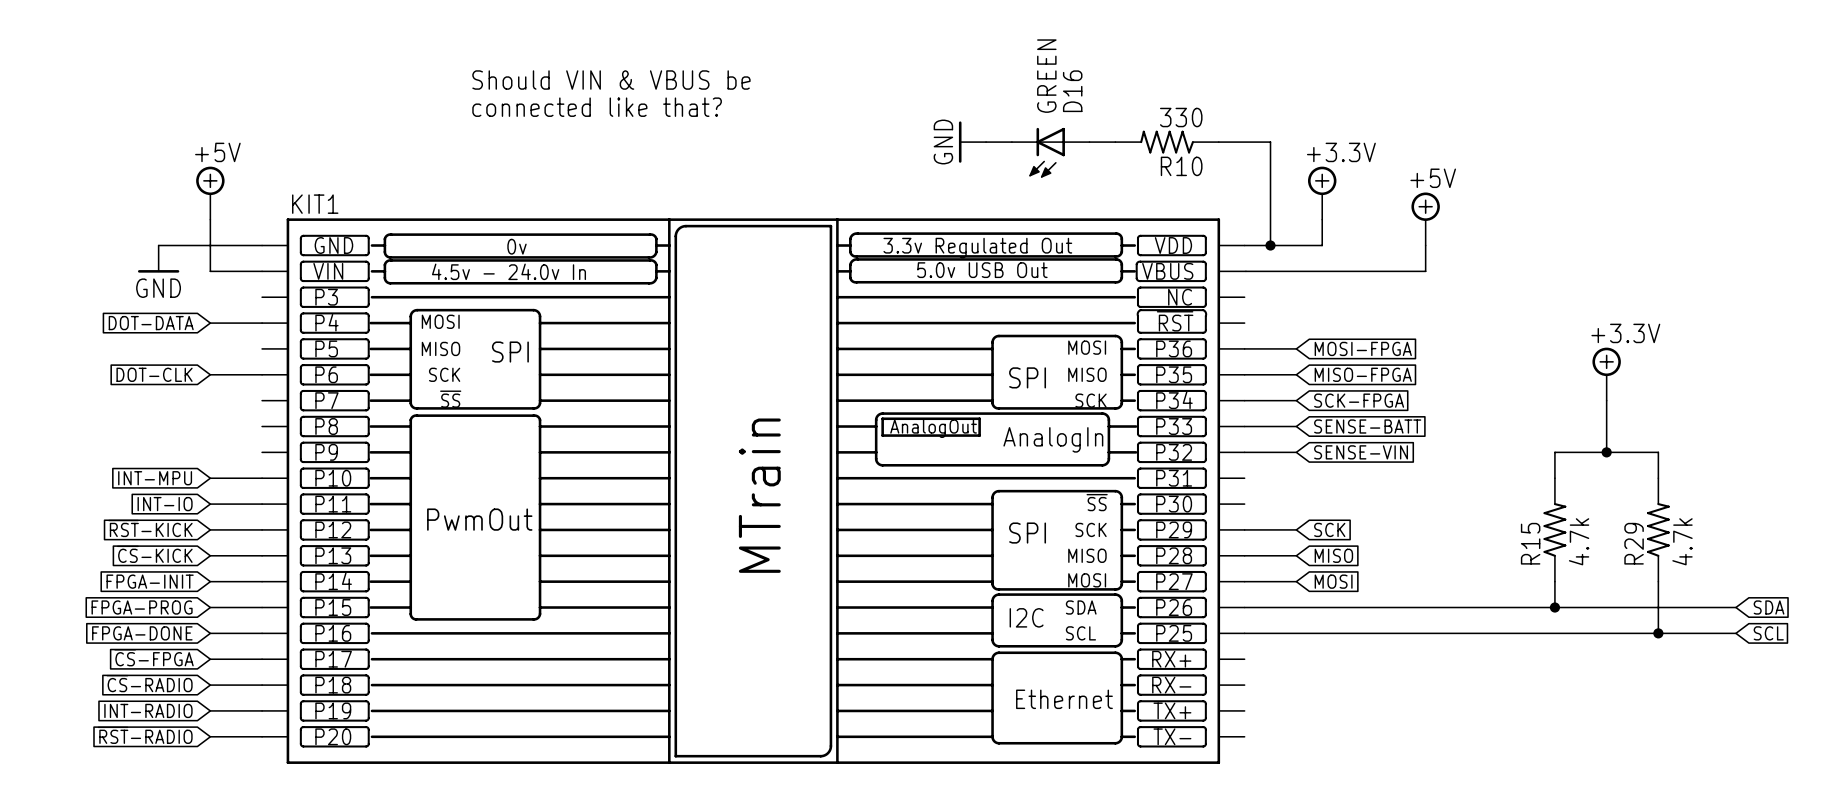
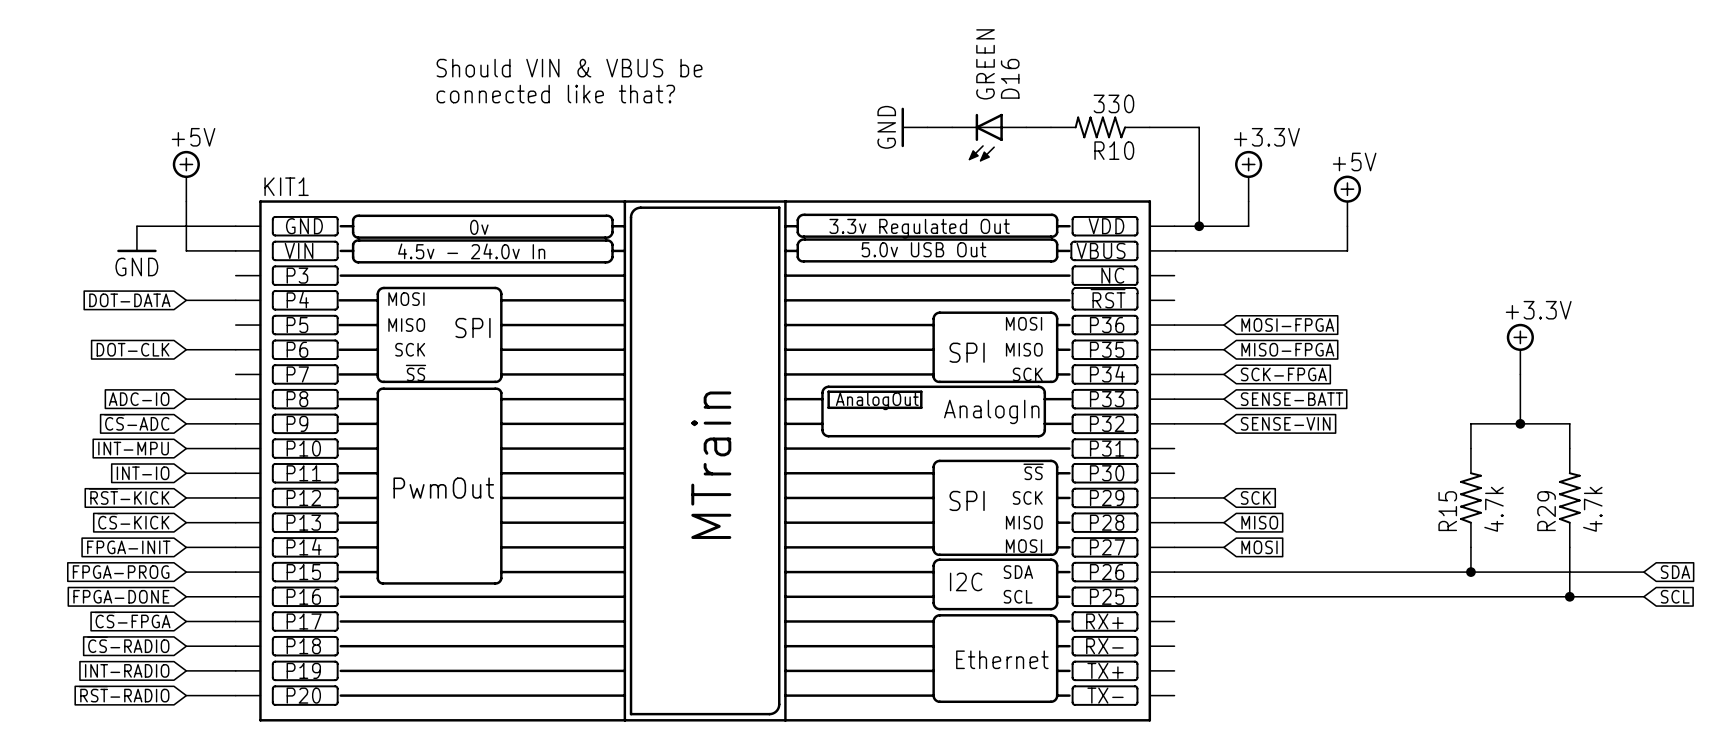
global label: none -> ADC-IO (139, 399)
wire: none -> (186, 399) (235, 399)
global label: none -> ~{CS}-ADC (136, 422)
wire: none -> (186, 423) (235, 423)

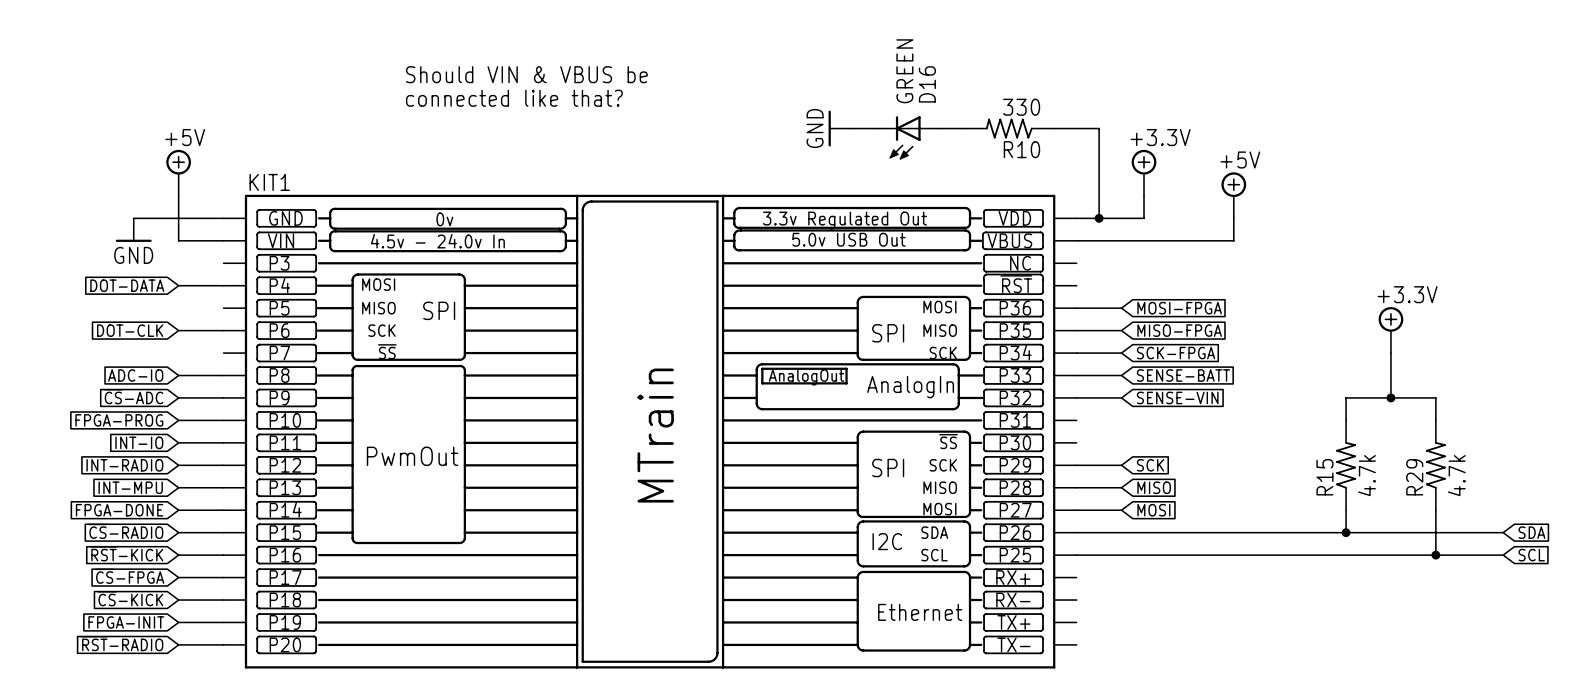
global label: INT-MPU (133, 448) -> FPGA-PROG (119, 420)
global label: ~{RST}-KICK (129, 496) -> INT-RADIO (124, 465)
global label: ~{CS}-KICK (133, 521) -> INT-MPU (130, 487)
global label: FPGA-INIT (128, 547) -> FPGA-DONE (119, 510)
global label: FPGA-PROG (121, 572) -> ~{CS}-RADIO (125, 531)
global label: FPGA-DONE (121, 596) -> ~{RST}-KICK (126, 553)
global label: ~{CS}-RADIO (128, 644) -> ~{CS}-KICK (130, 598)
global label: INT-RADIO (127, 670) -> FPGA-INIT (126, 622)

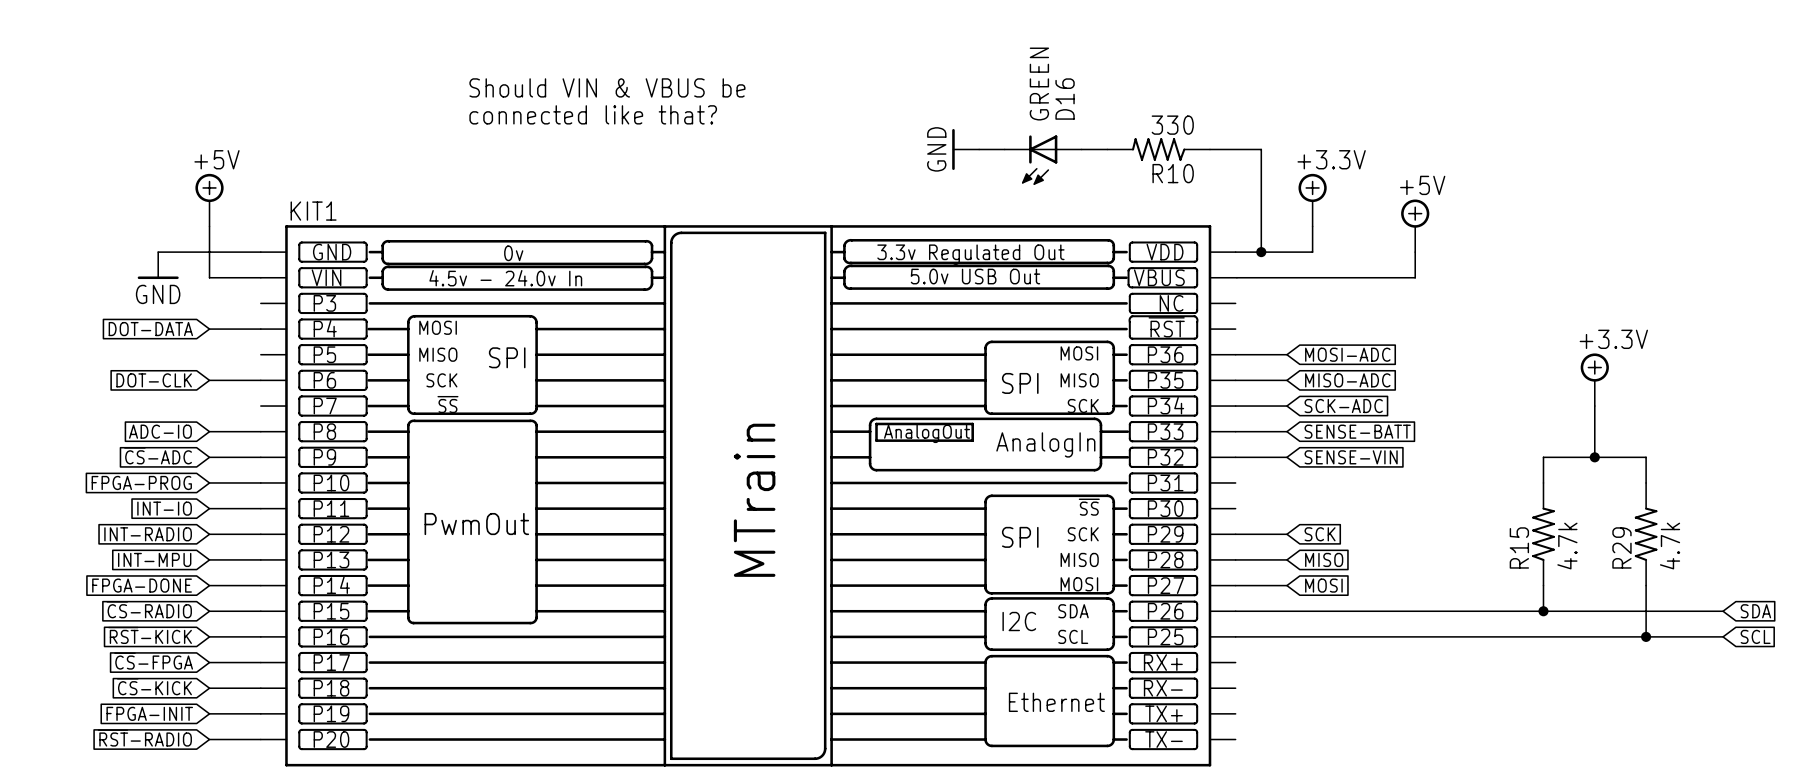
global label: MOSI-FPGA (1179, 308) -> MOSI-ADC (1347, 354)
global label: MISO-FPGA (1179, 330) -> MISO-ADC (1347, 380)
global label: SCK-FPGA (1176, 353) -> SCK-ADC (1343, 406)

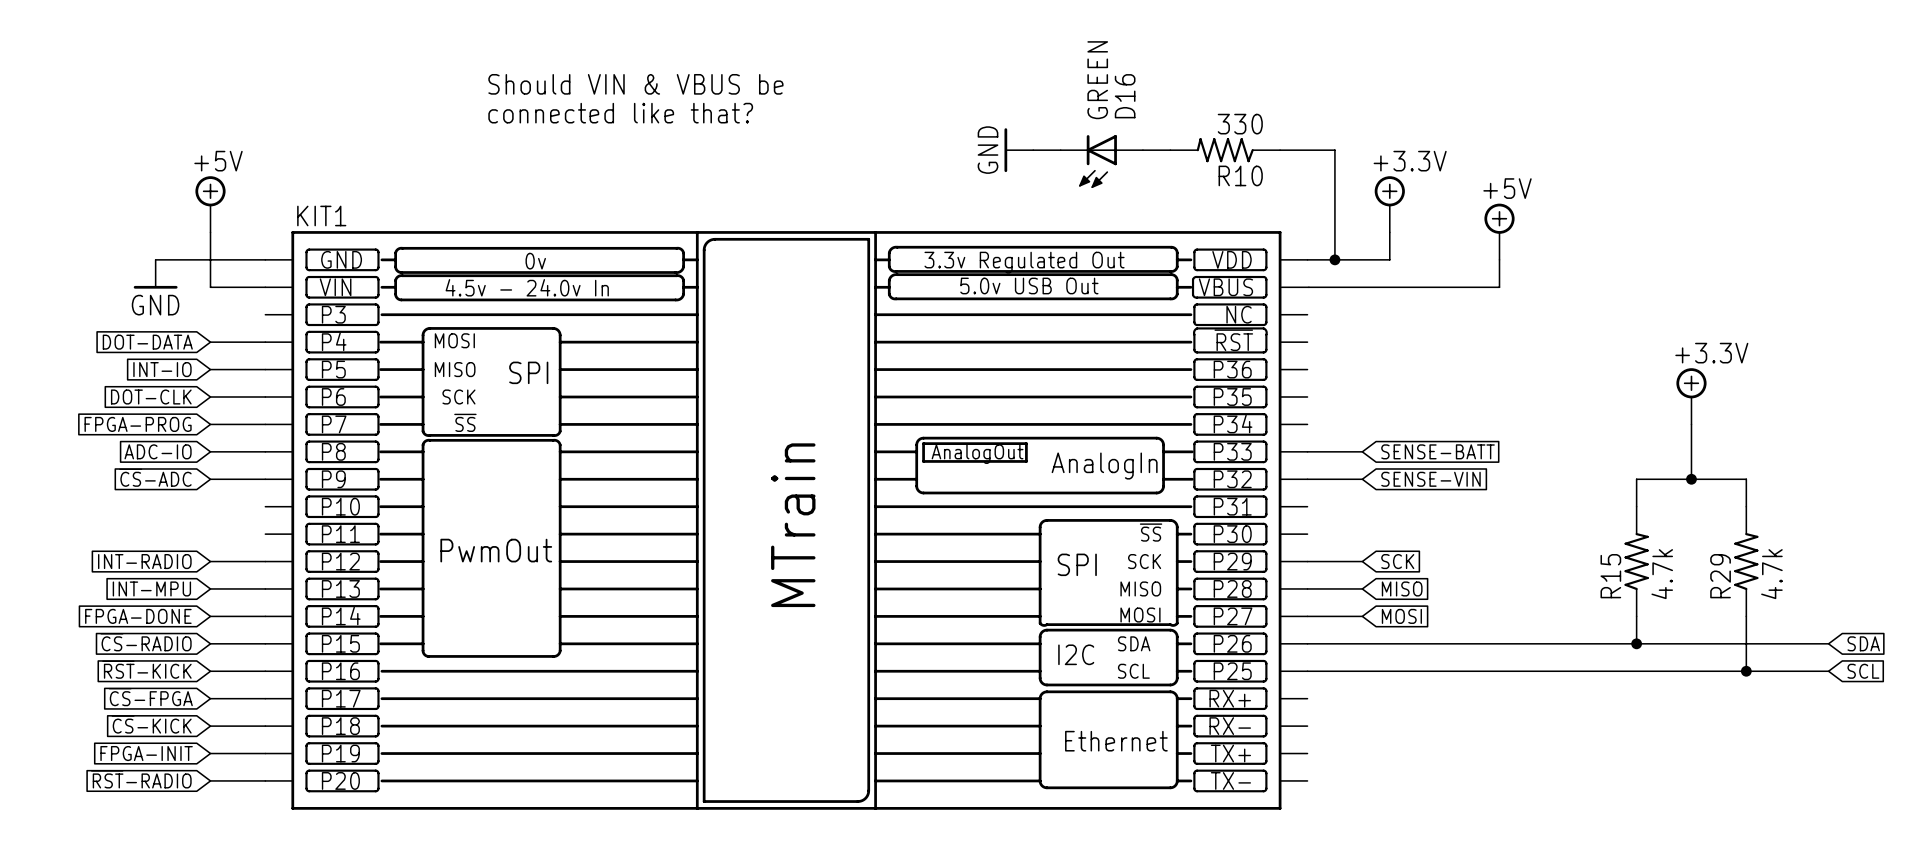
KIT1 symbol: [260, 225, 1237, 767] -> [265, 231, 1309, 810]
wire: (1235, 354) (1286, 354) -> none
global label: MOSI-ADC (1347, 354) -> none
wire: (1235, 380) (1286, 380) -> none
global label: MISO-ADC (1347, 380) -> none
wire: (1235, 406) (1286, 406) -> none
global label: SCK-ADC (1343, 406) -> none
global label position: FPGA-PROG (141, 482) -> FPGA-PROG (138, 424)
wire: (209, 482) (260, 482) -> (210, 424) (265, 424)
global label position: INT-IO (164, 508) -> INT-IO (162, 369)
wire: (209, 508) (260, 508) -> (210, 369) (265, 369)

